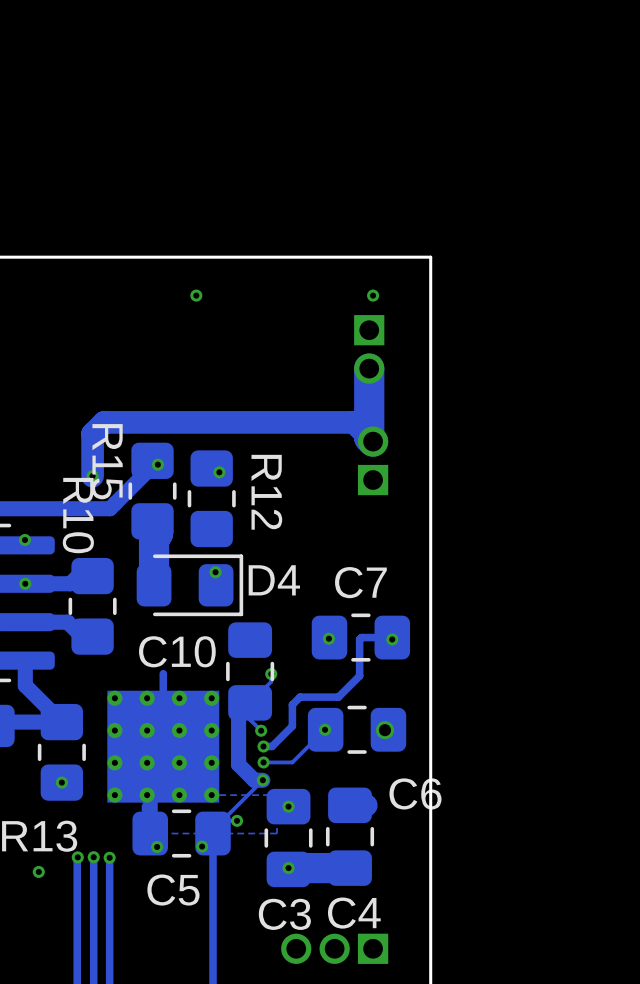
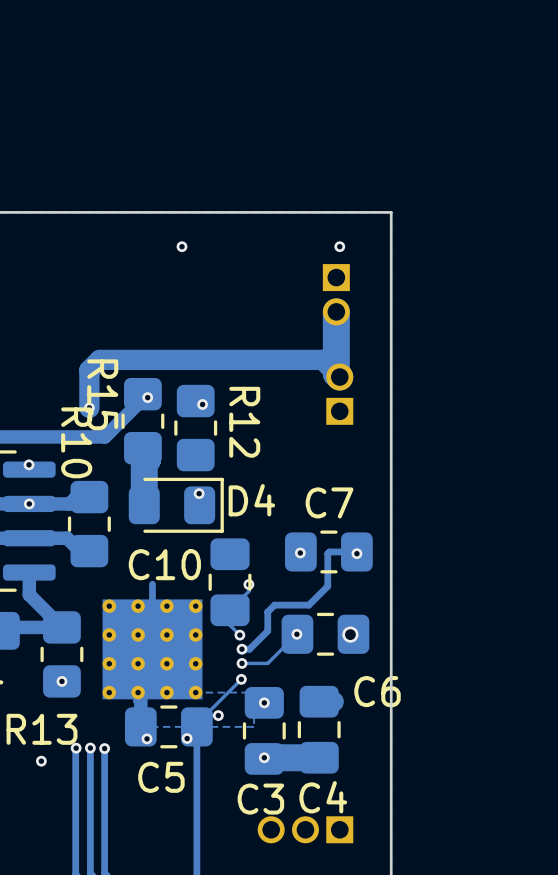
track: (250, 702) (238, 714) (238, 764) (254, 780) (262, 780) -> none

